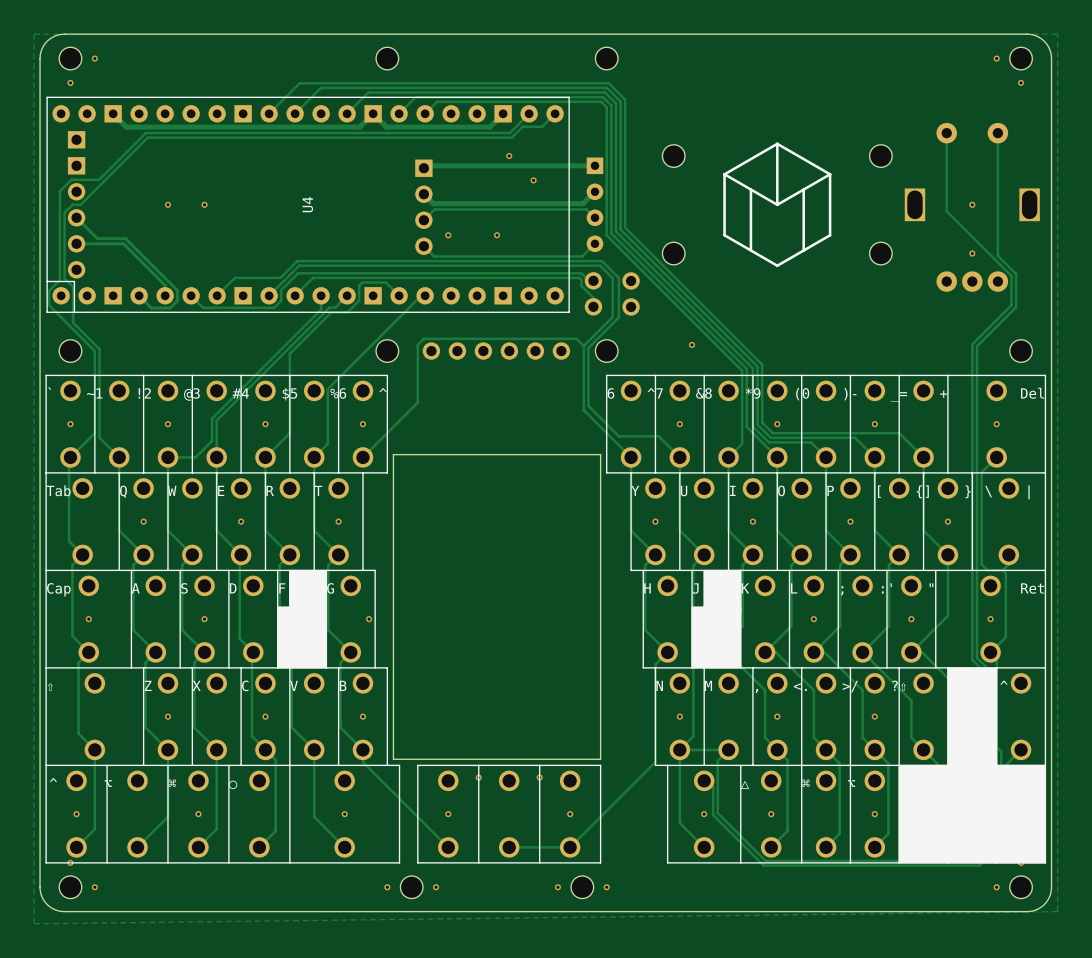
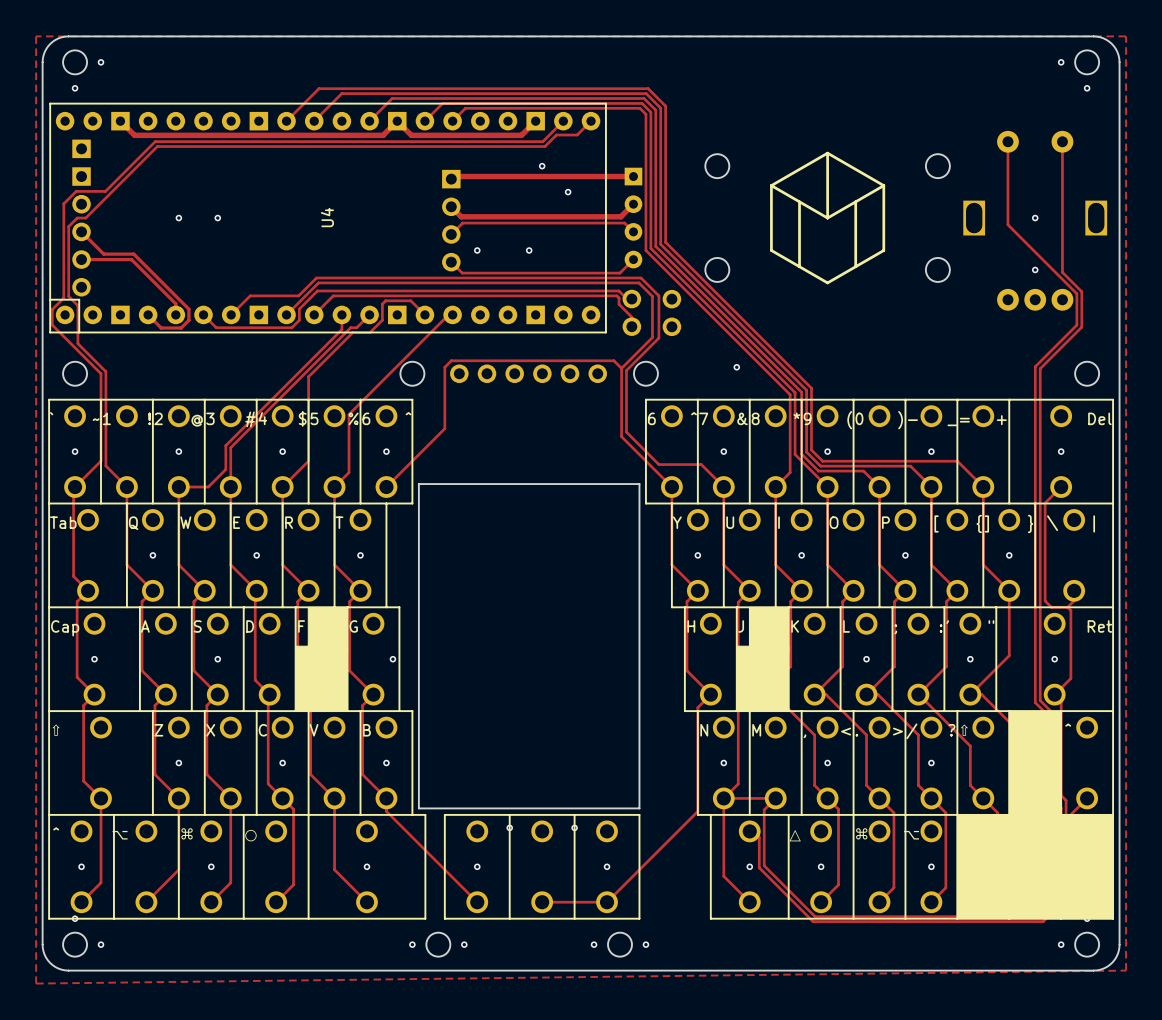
part: (387, 58) -> none
part: (606, 58) -> none

